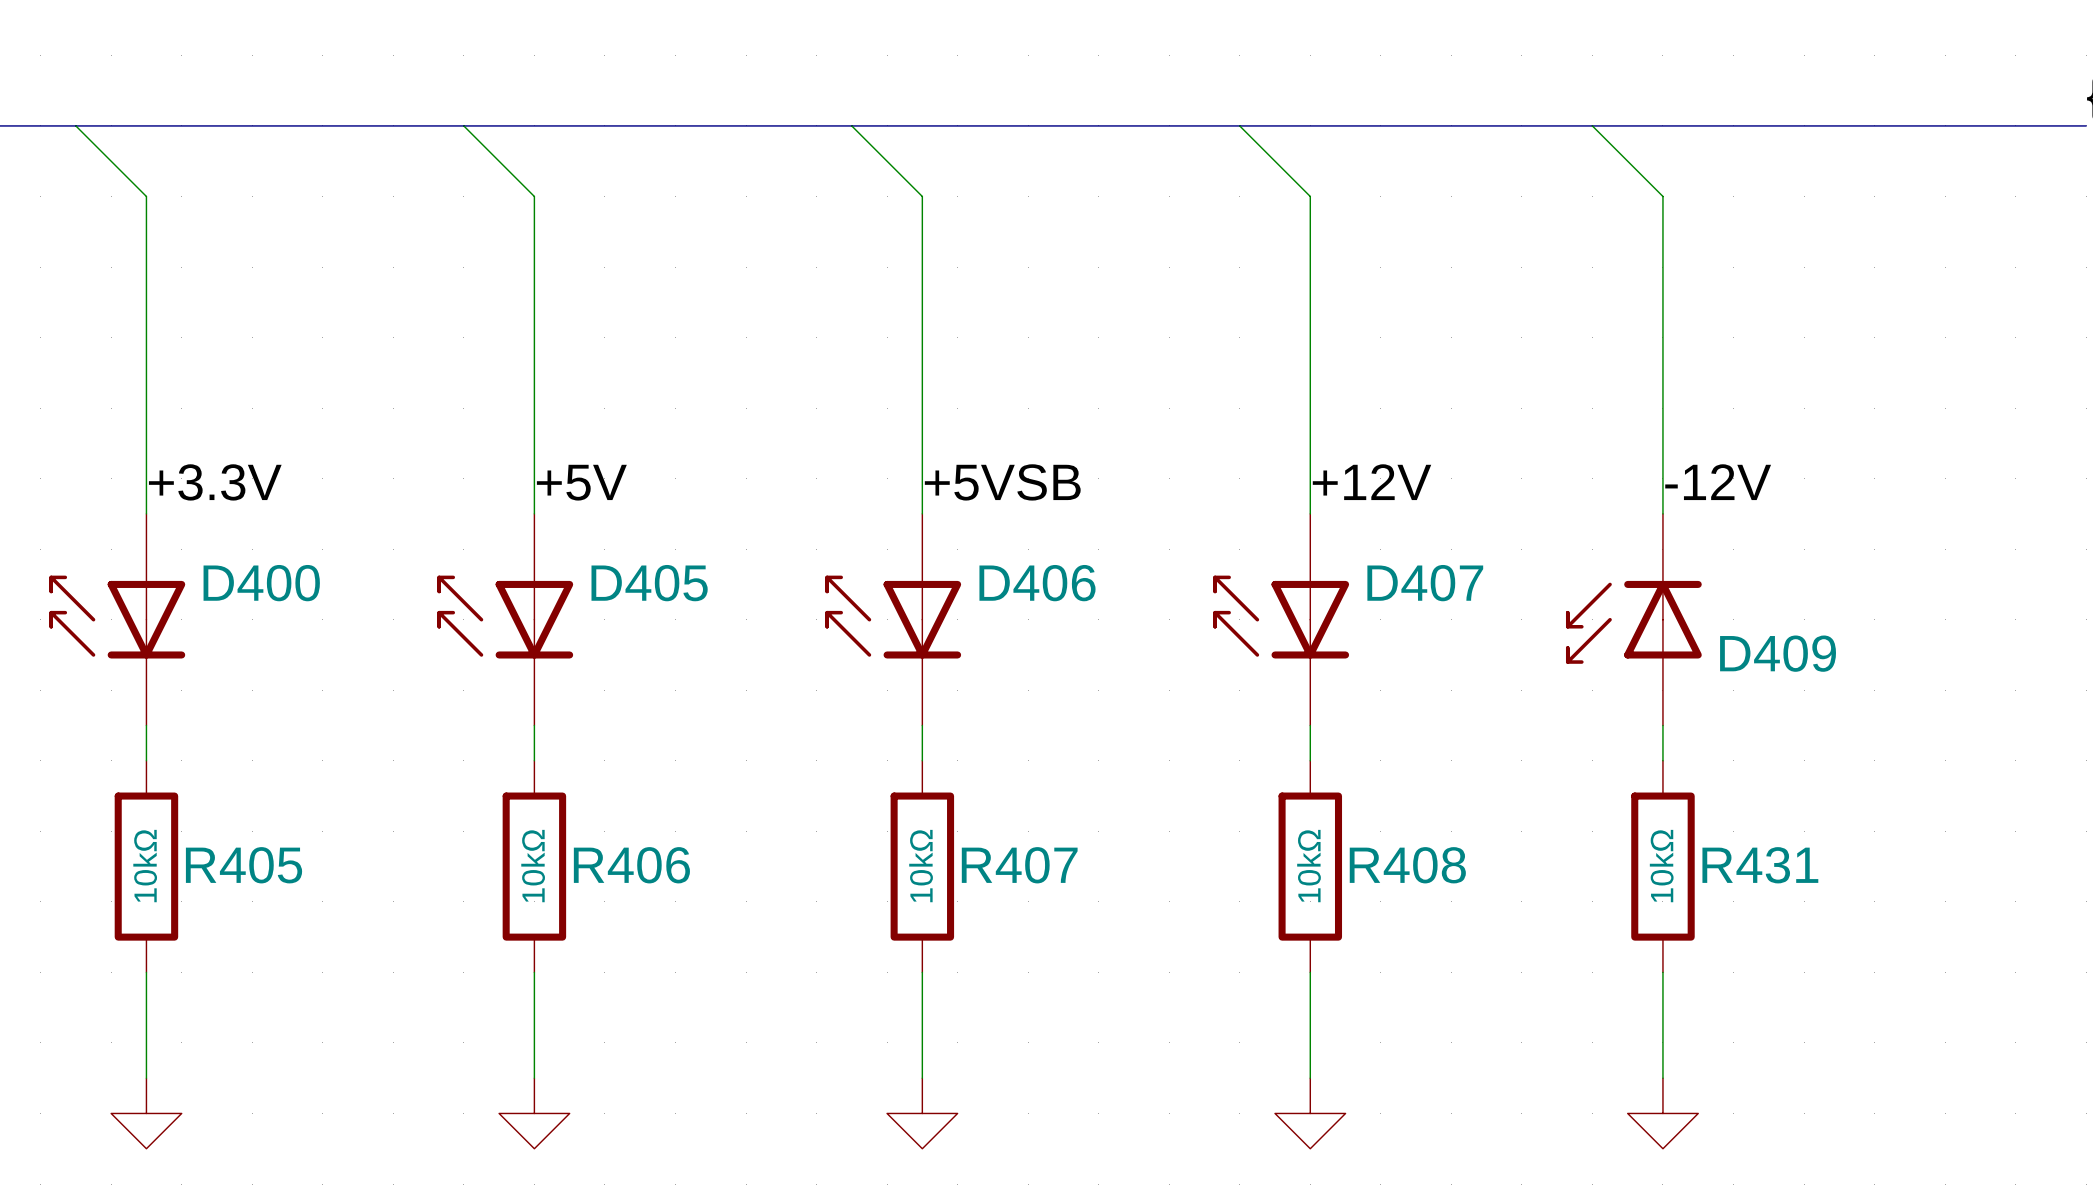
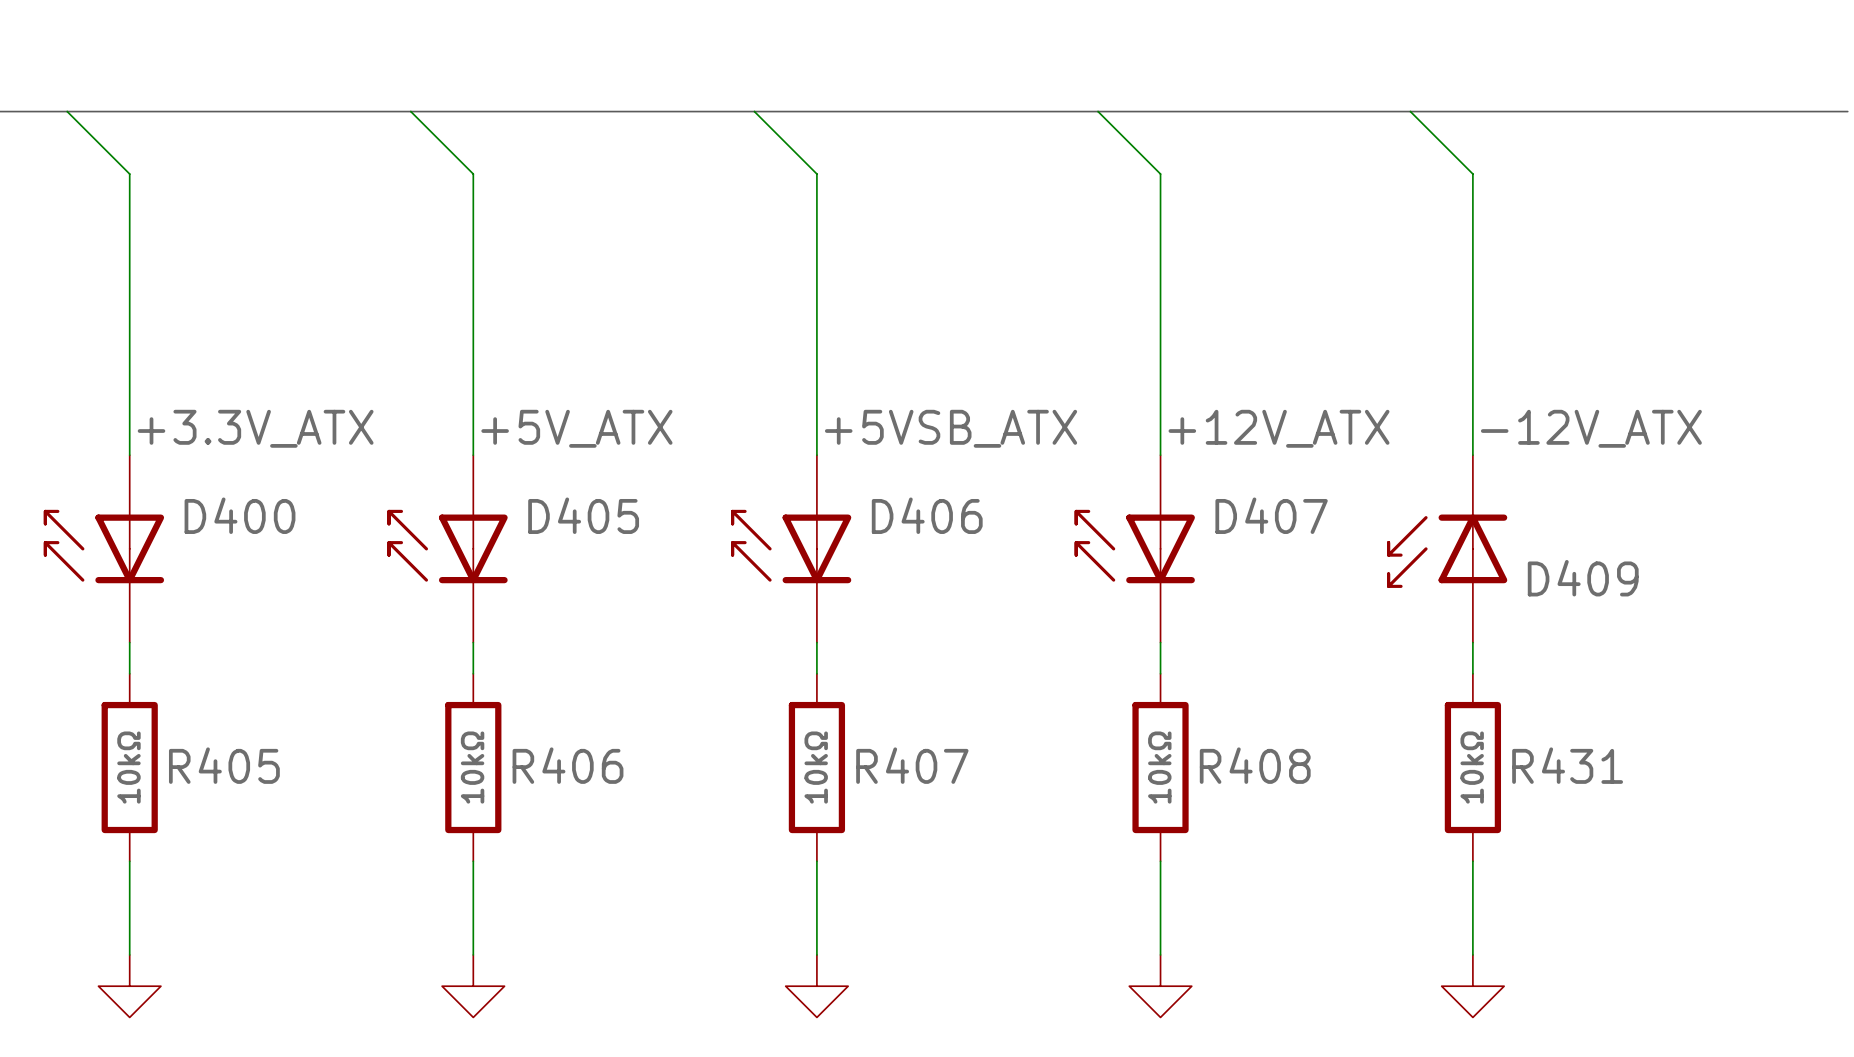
label: +3.3V (215, 482) -> +3.3V_ATX (255, 428)
label: +5V (581, 482) -> +5V_ATX (576, 428)
label: +5VSB (1002, 482) -> +5VSB_ATX (951, 428)
label: +12V (1372, 482) -> +12V_ATX (1279, 428)
label: -12V (1718, 482) -> -12V_ATX (1591, 428)

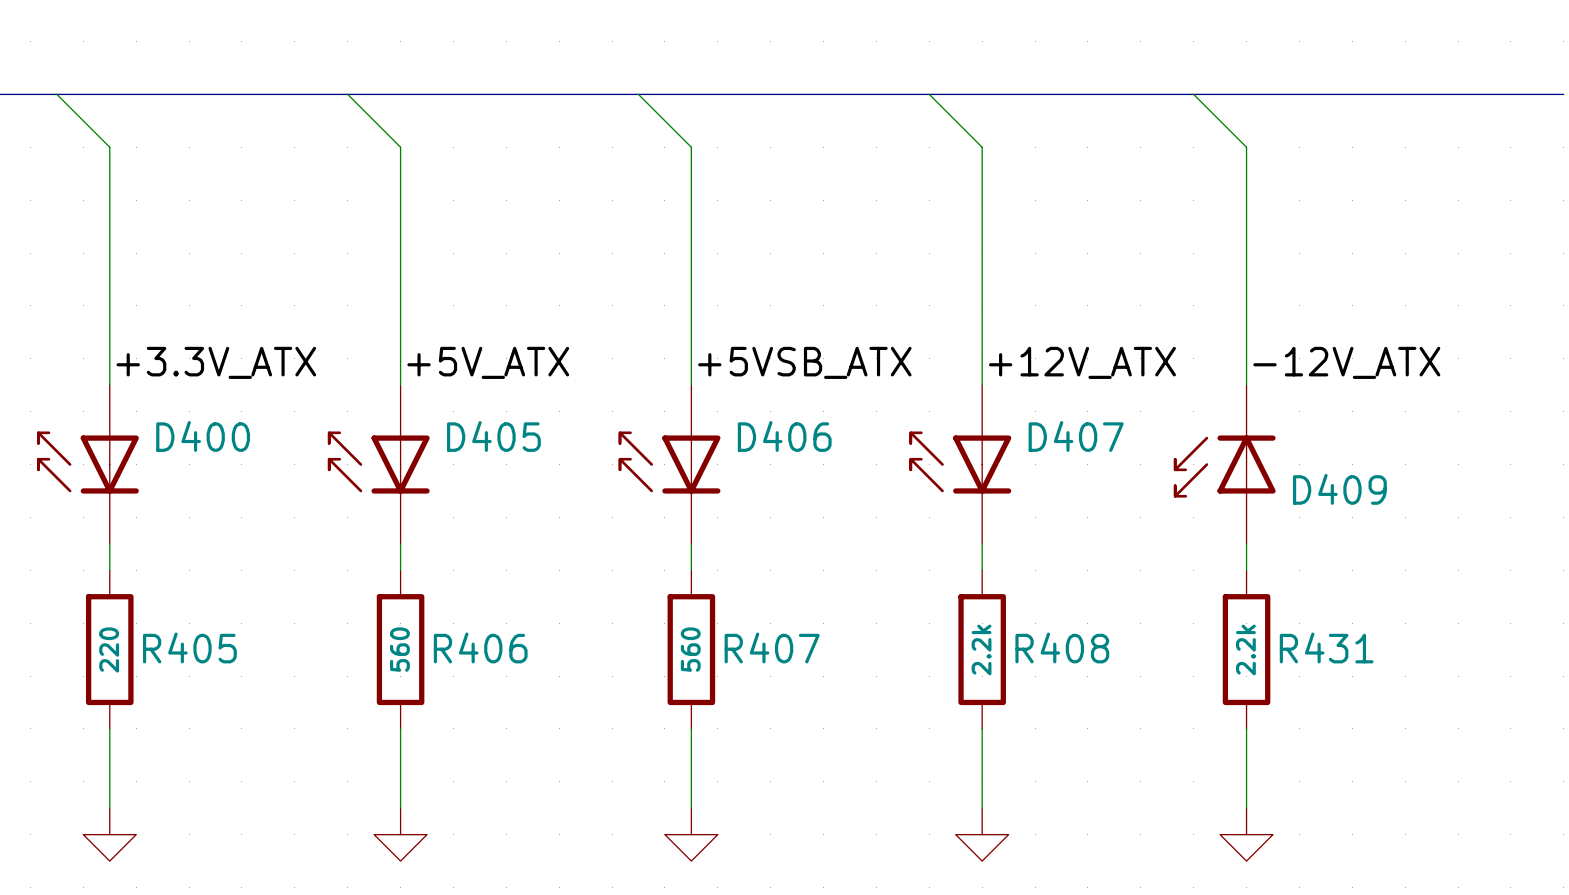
R405 value: 10kΩ (128, 767) -> 220 (109, 649)
R406 value: 10kΩ (472, 767) -> 560 (399, 649)
R407 value: 10kΩ (816, 767) -> 560 (690, 649)
R408 value: 10kΩ (1159, 767) -> 2.2k (981, 649)
R431 value: 10kΩ (1472, 767) -> 2.2k (1245, 649)

